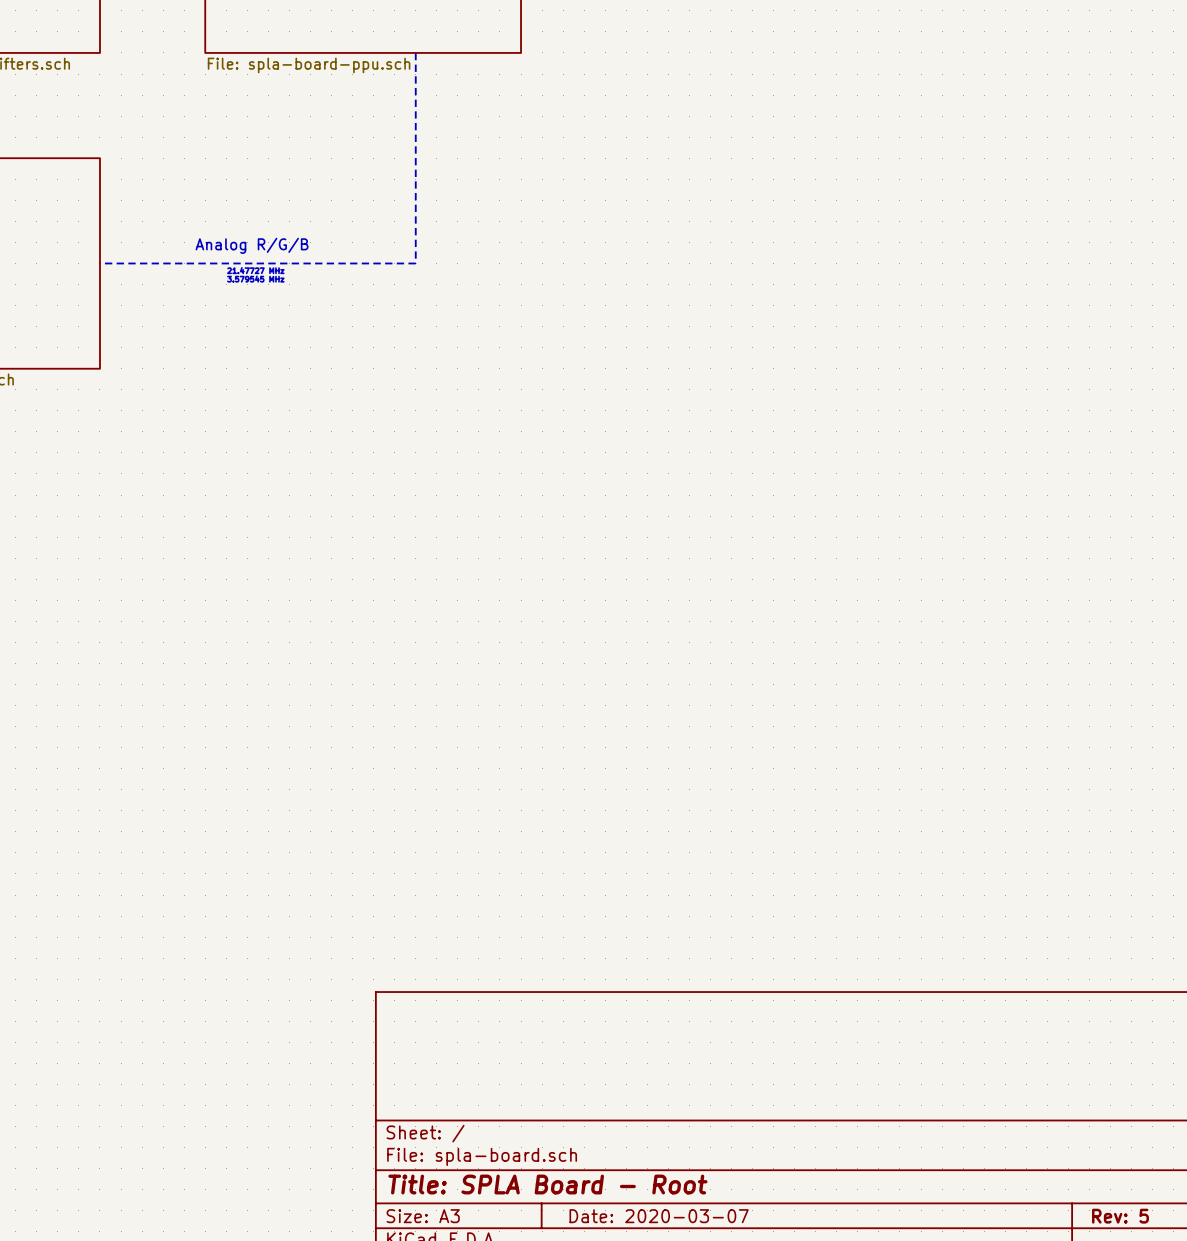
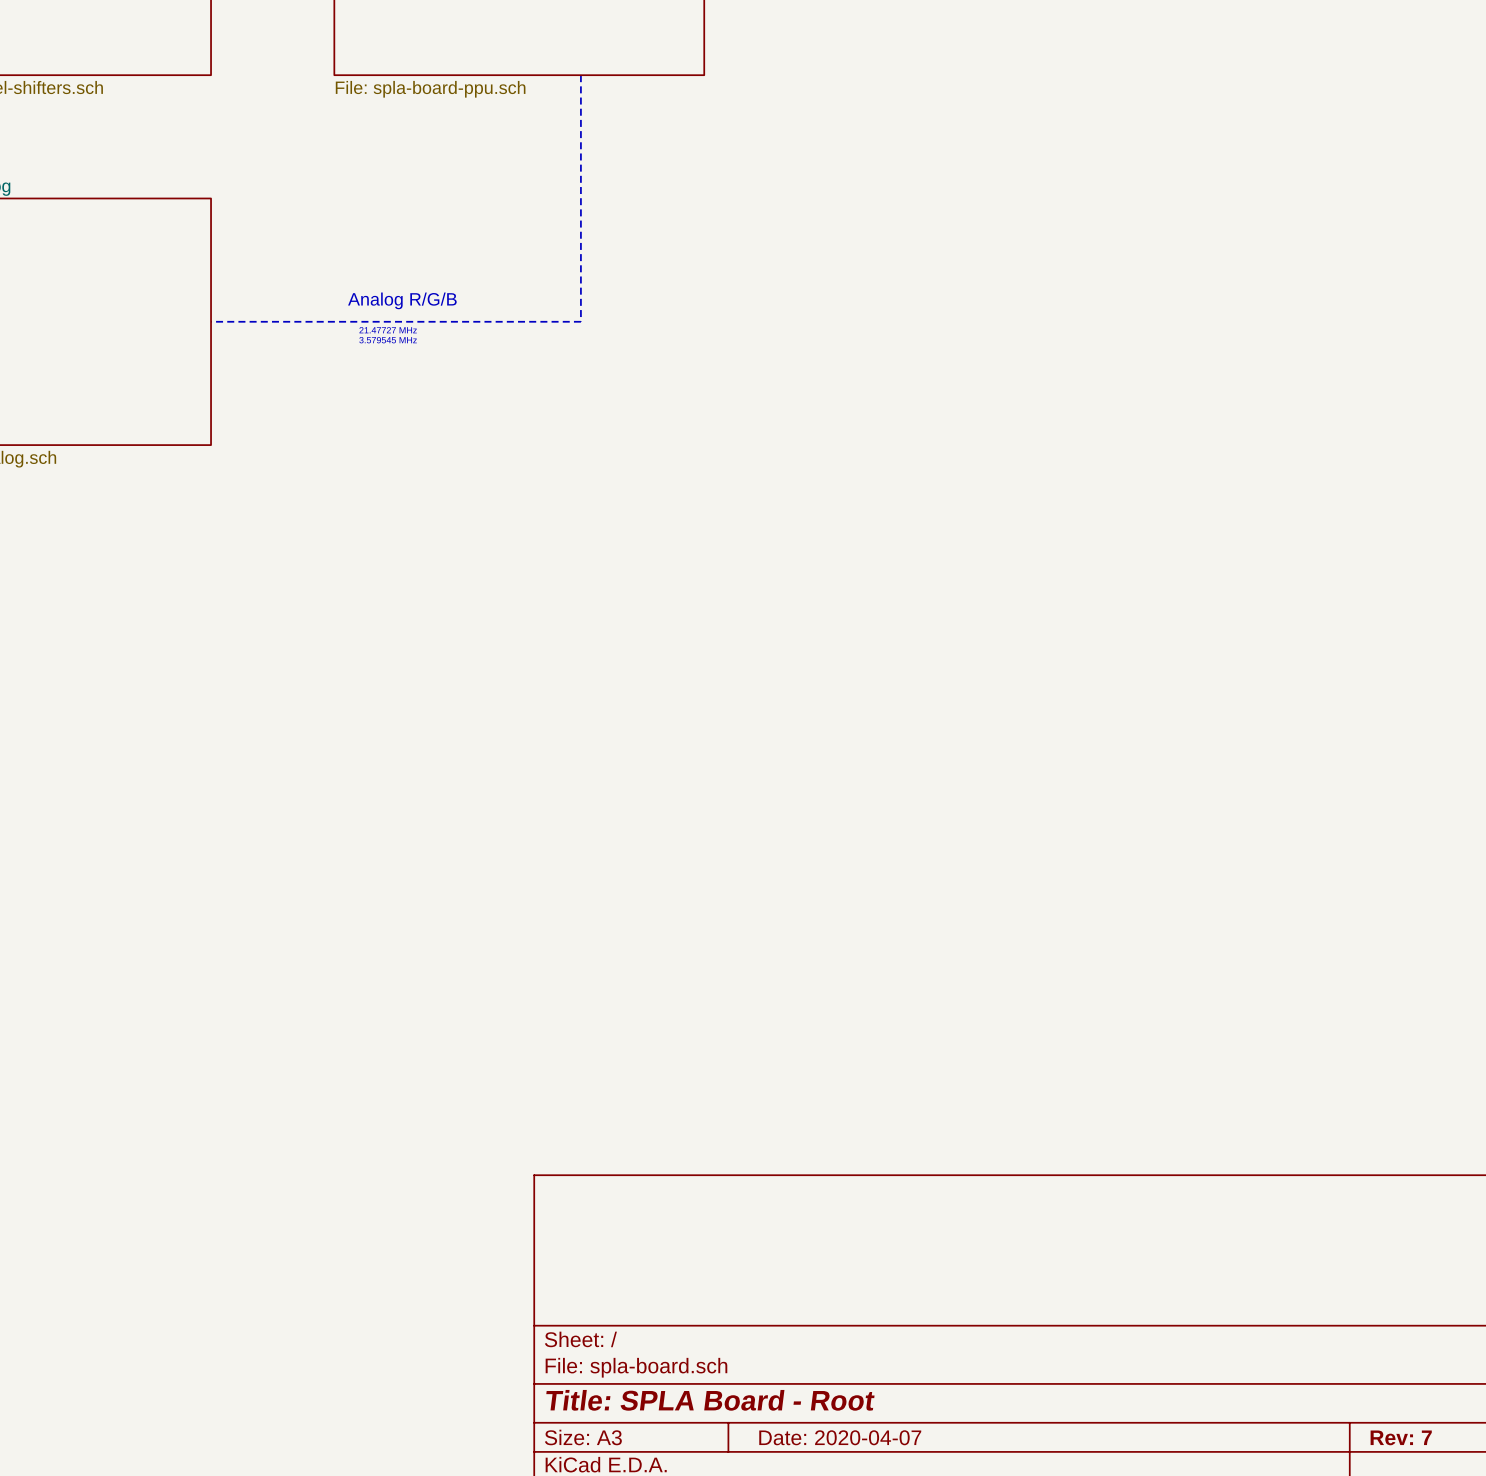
title block: Date: 2020-03-07 (659, 1216) -> Date: 2020-04-07 (840, 1437)
title block: Rev: 5 (1120, 1216) -> Rev: 7 (1401, 1437)

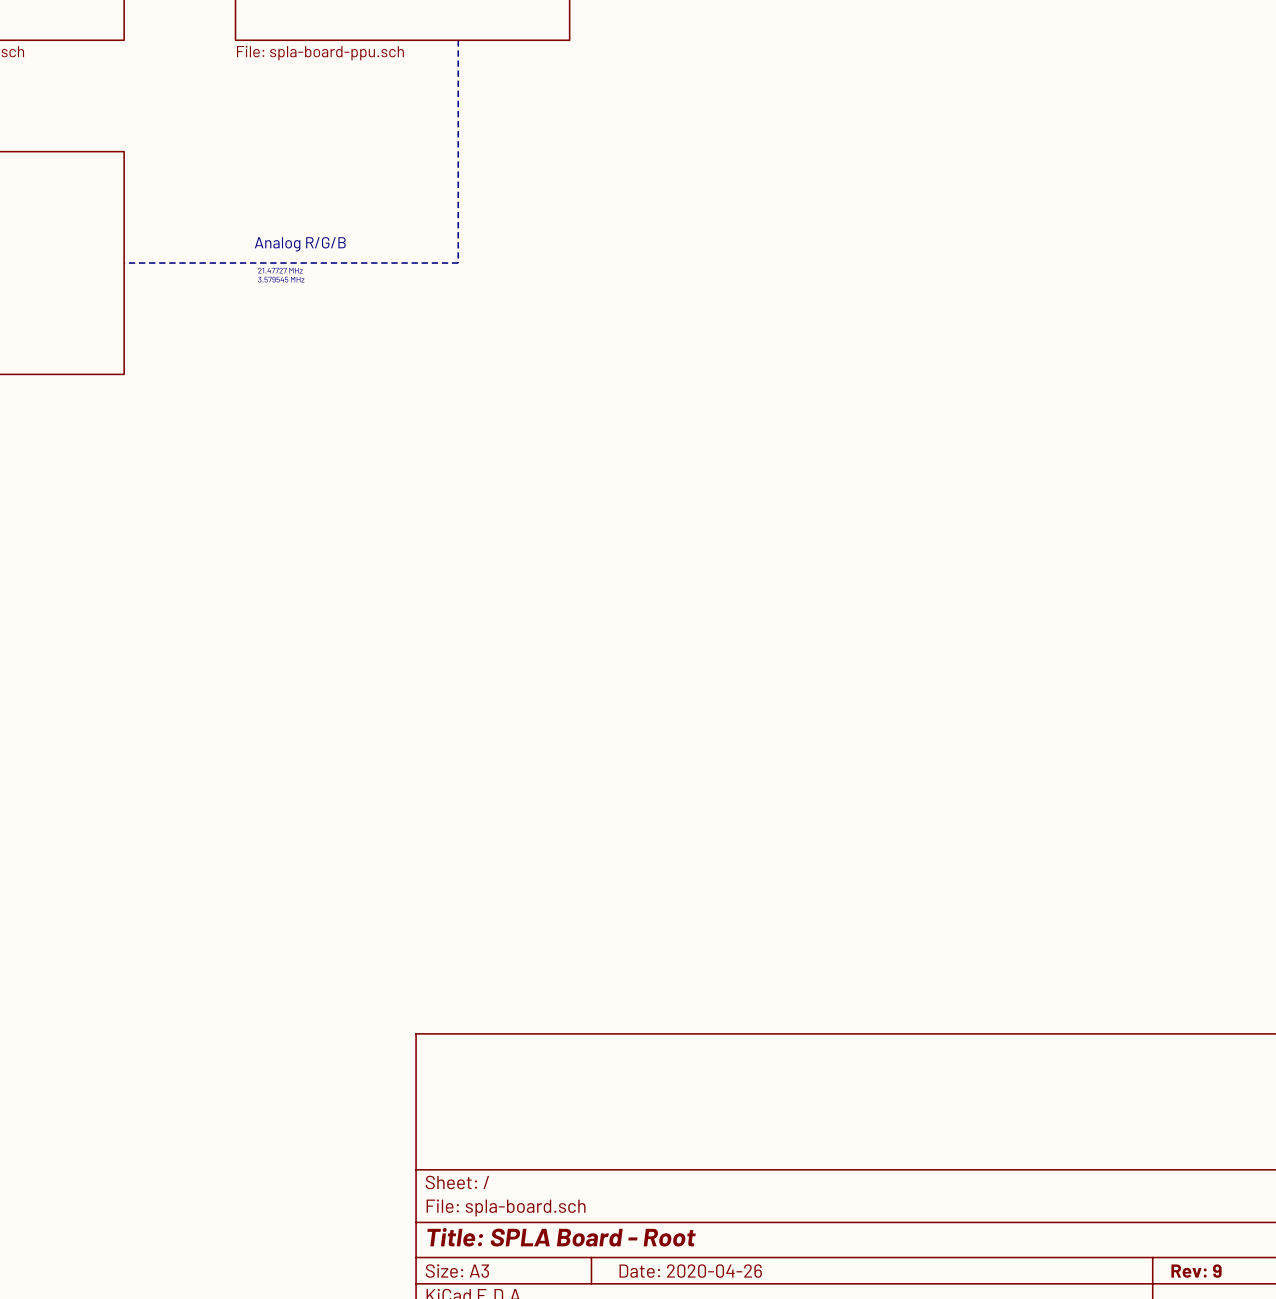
title block: Date: 2020-04-07 (840, 1437) -> Date: 2020-04-26 (690, 1271)
title block: Rev: 7 (1401, 1437) -> Rev: 9 (1196, 1271)

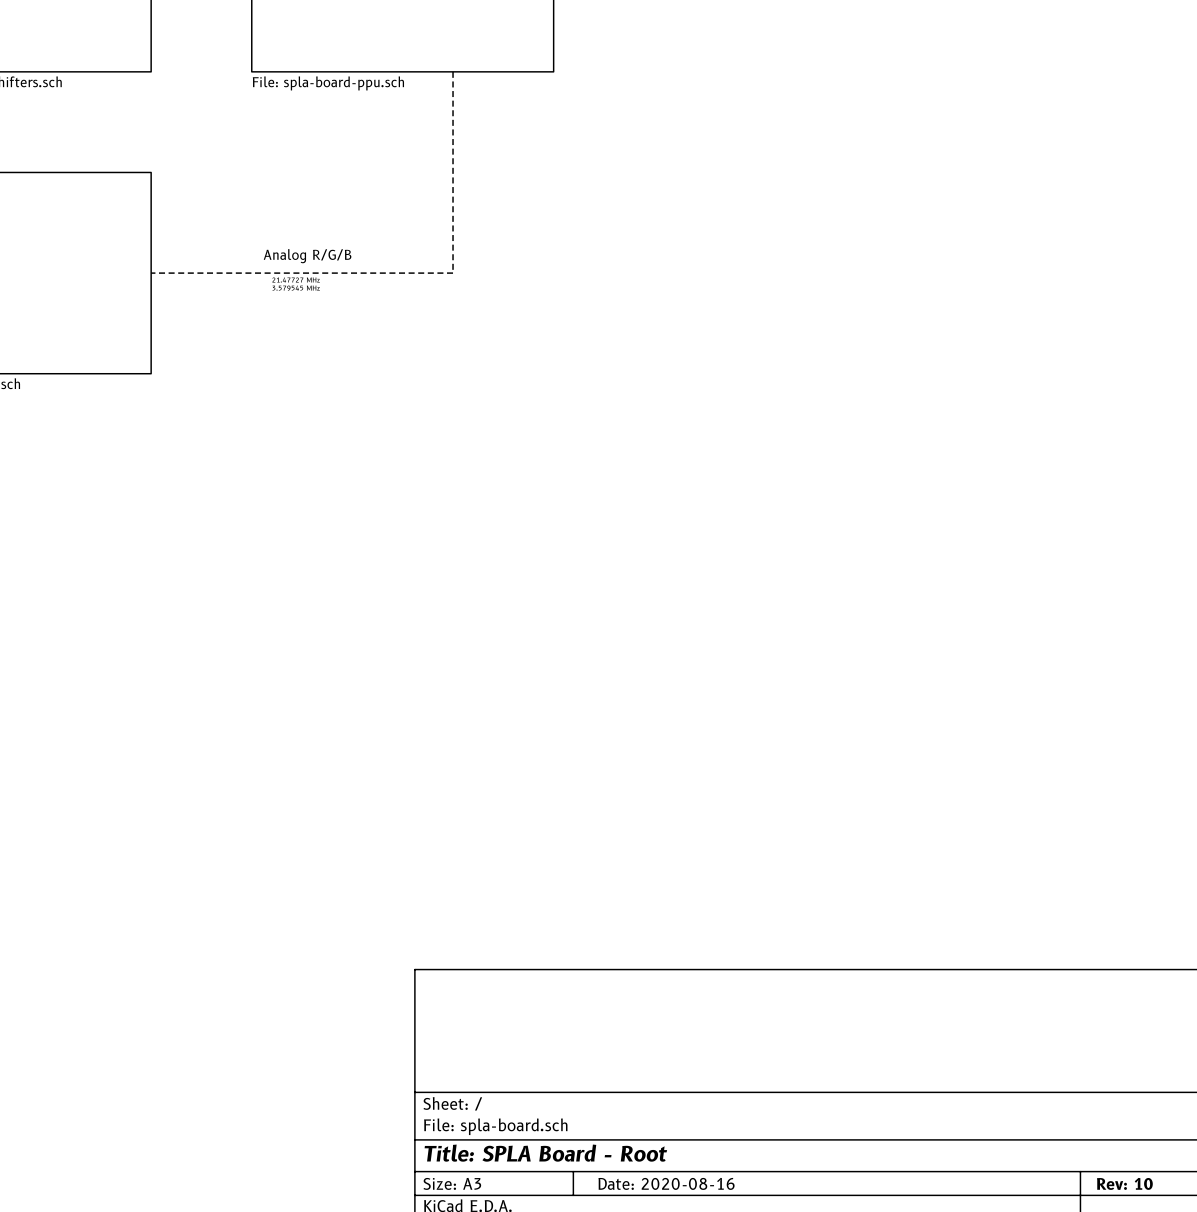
title block: Date: 2020-04-26 (690, 1271) -> Date: 2020-08-16 (666, 1183)
title block: Rev: 9 (1196, 1271) -> Rev: 10 (1124, 1183)

